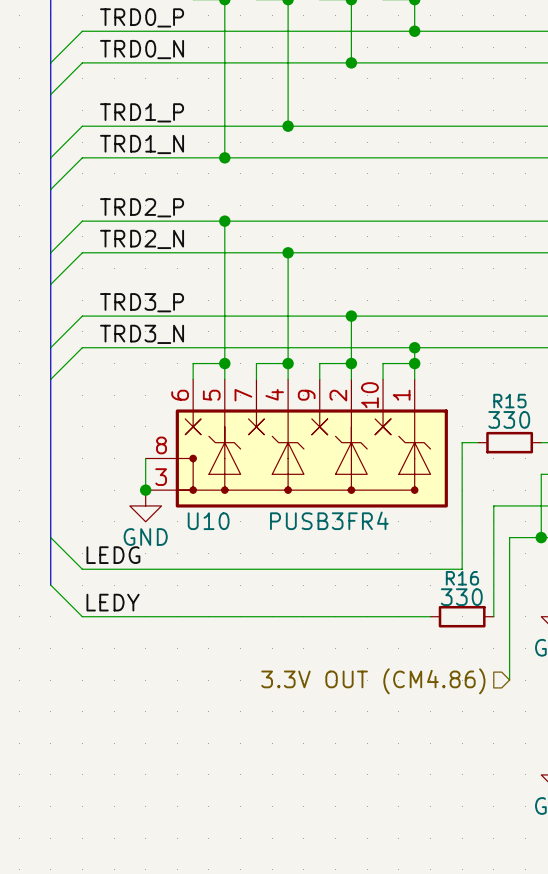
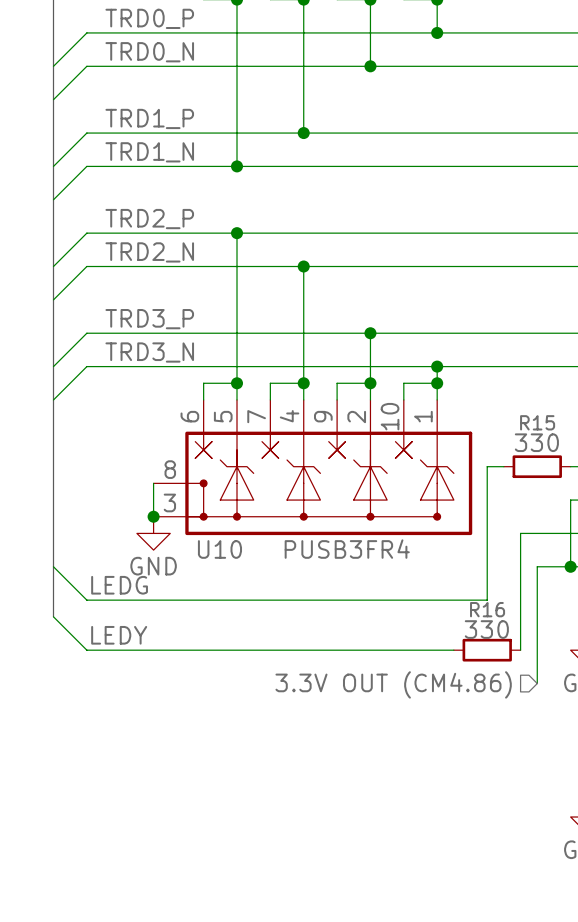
wire: (509, 648) (509, 680) -> none
hierarchical label position: 3.3V OUT (CM4.86) (373, 681) -> 3.3V OUT (CM4.86) (393, 684)

